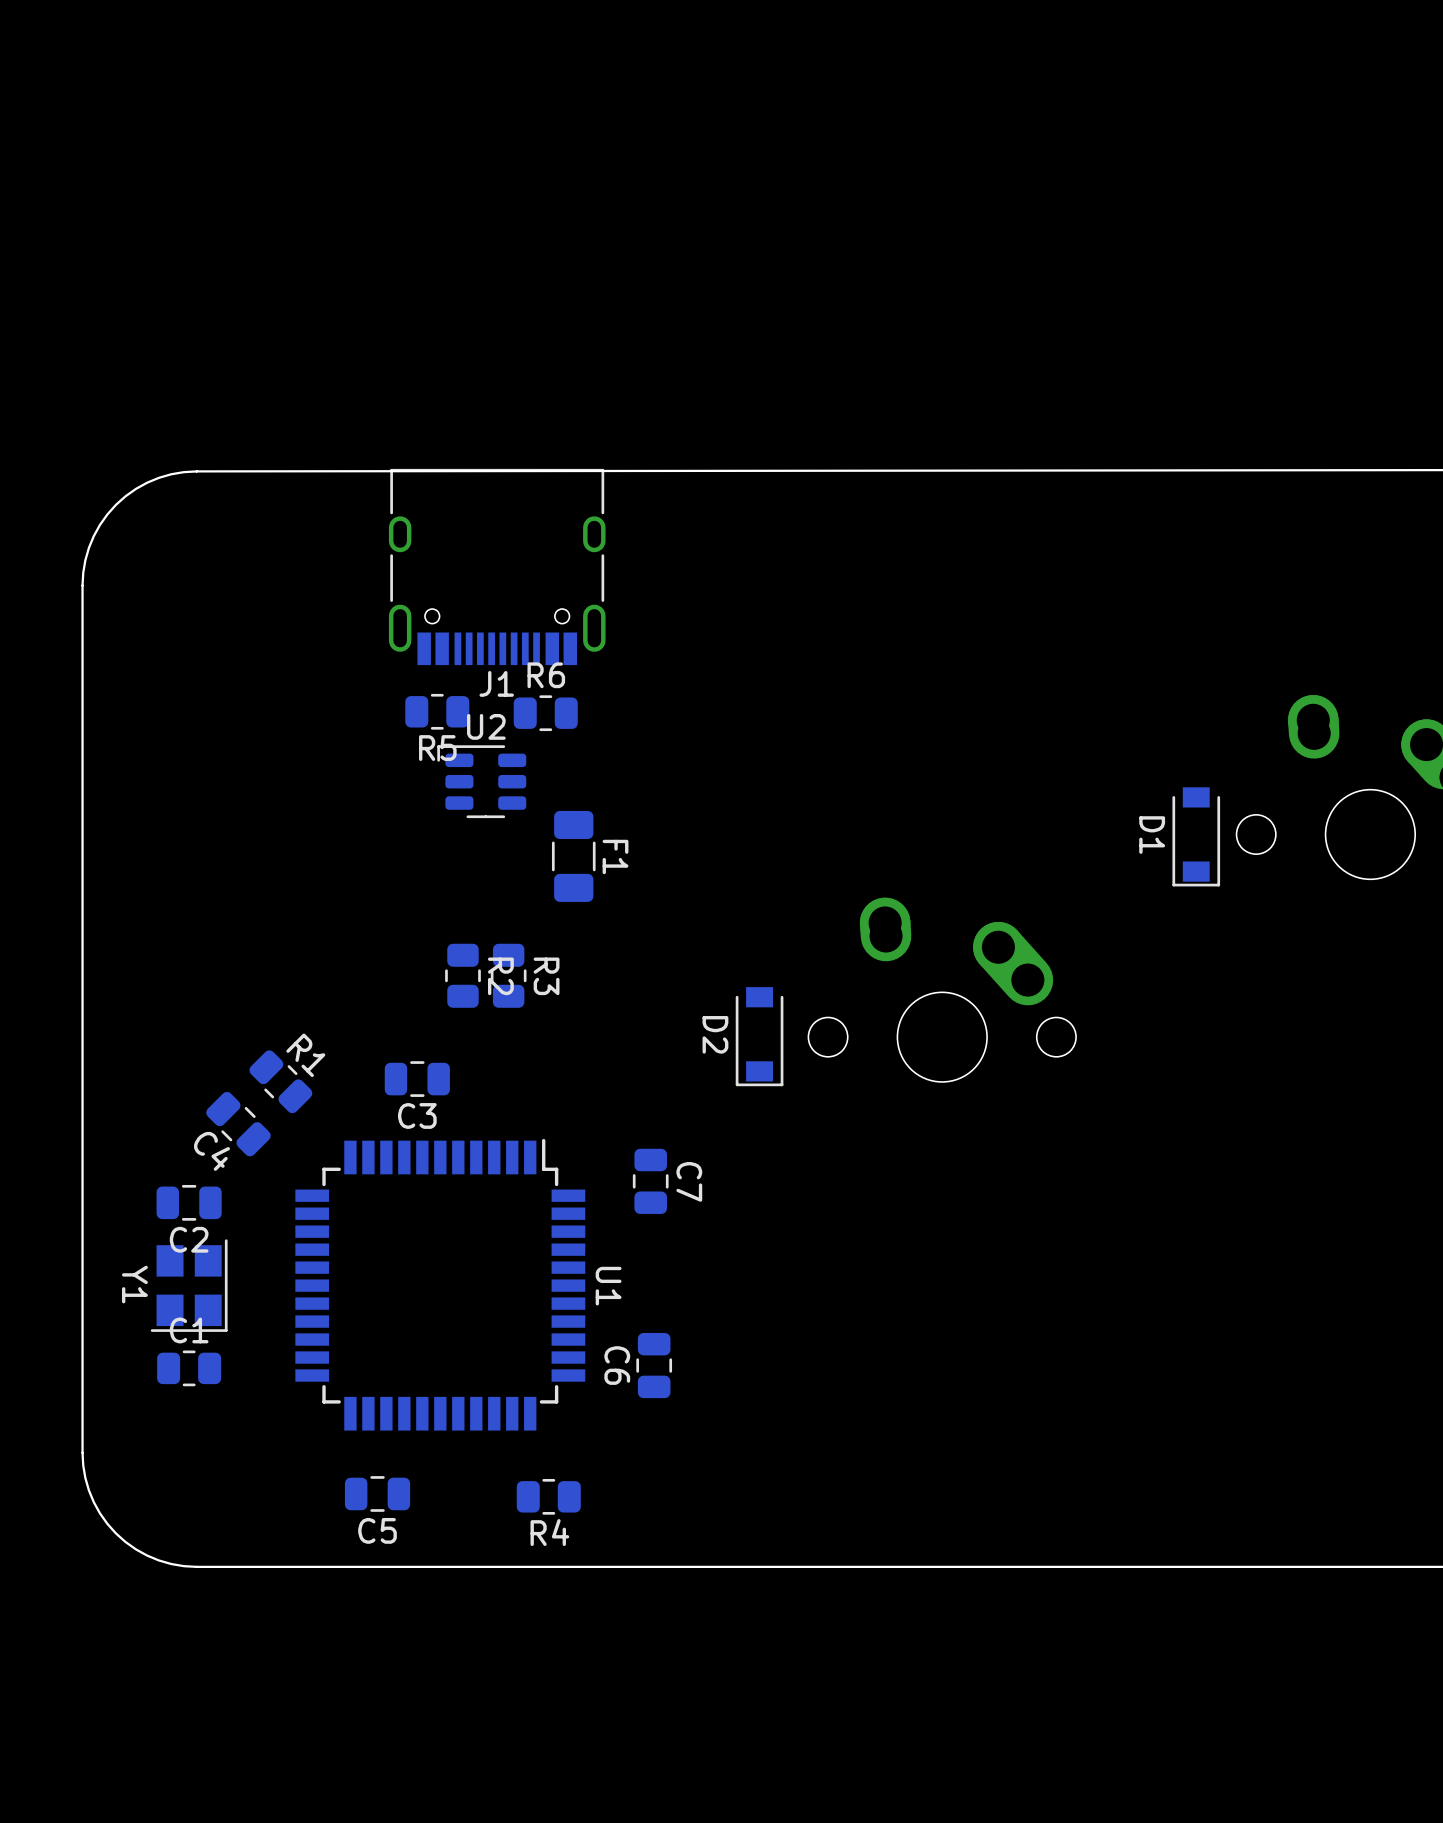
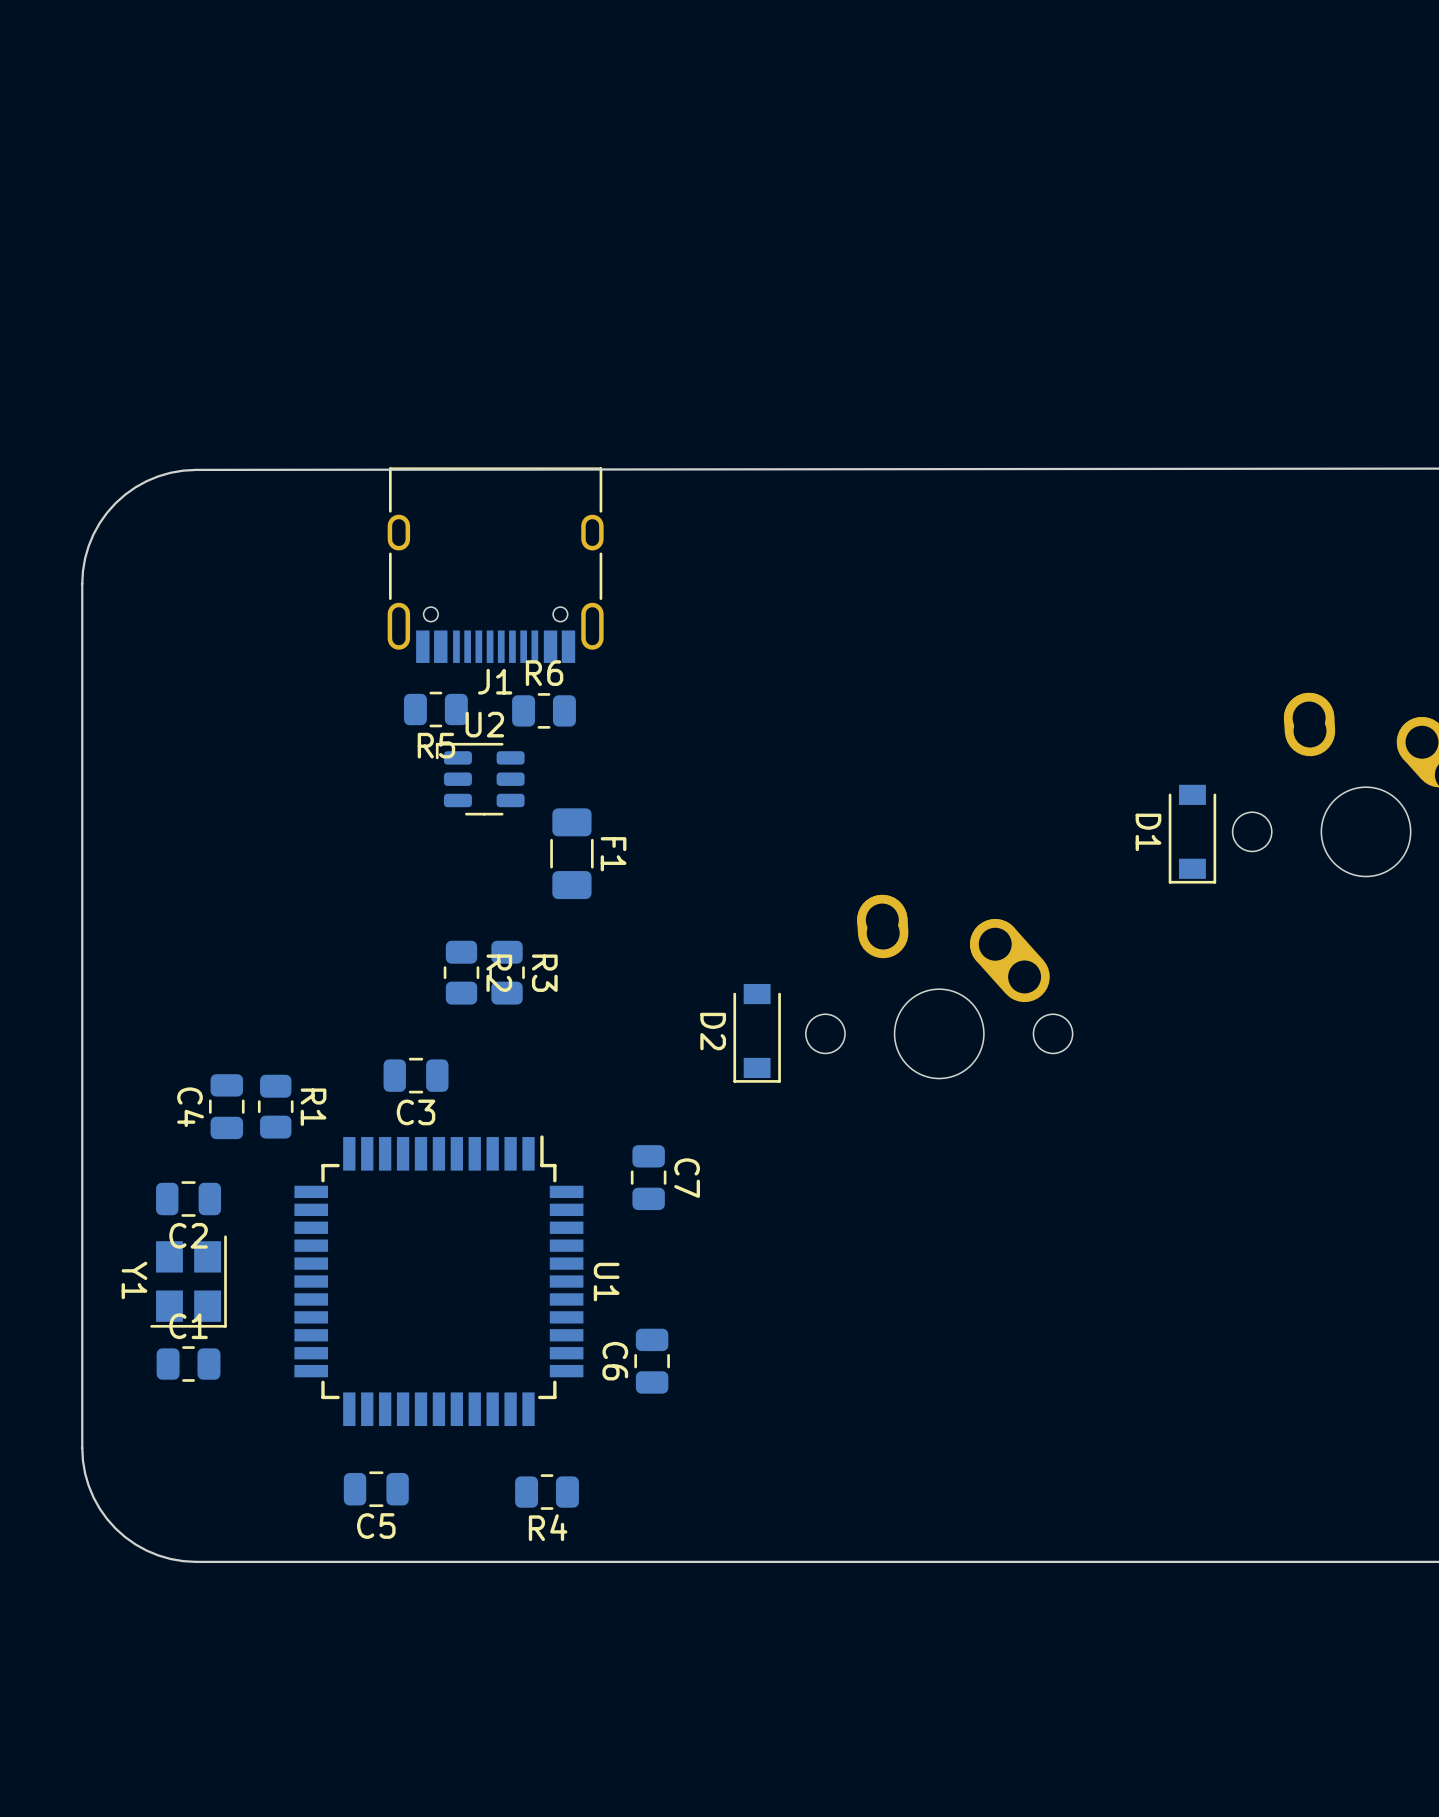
R1 rotation: 0° (280, 1081) -> 45° clockwise (275, 1106)
C4 rotation: 0° (238, 1124) -> 45° clockwise (226, 1106)

